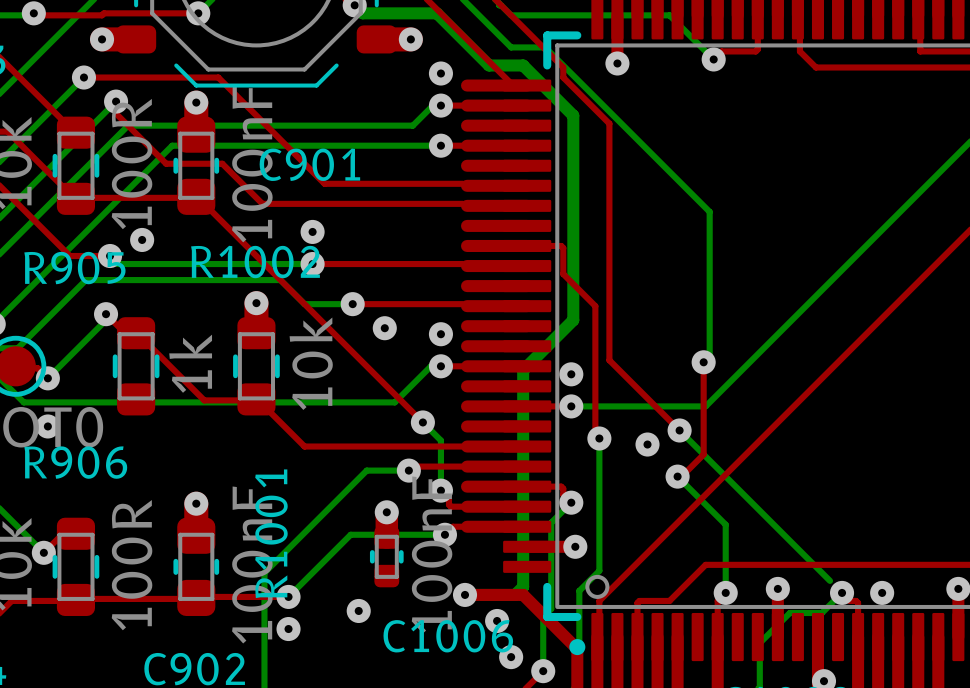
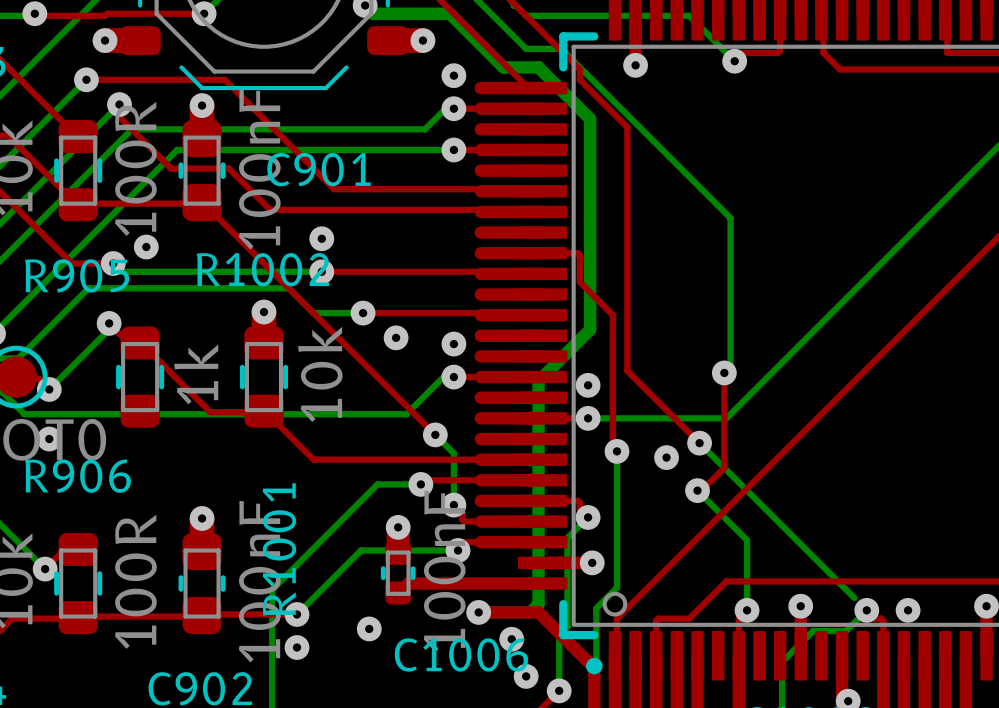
top track: none -> (540, 583) (408, 583) (400, 591)

